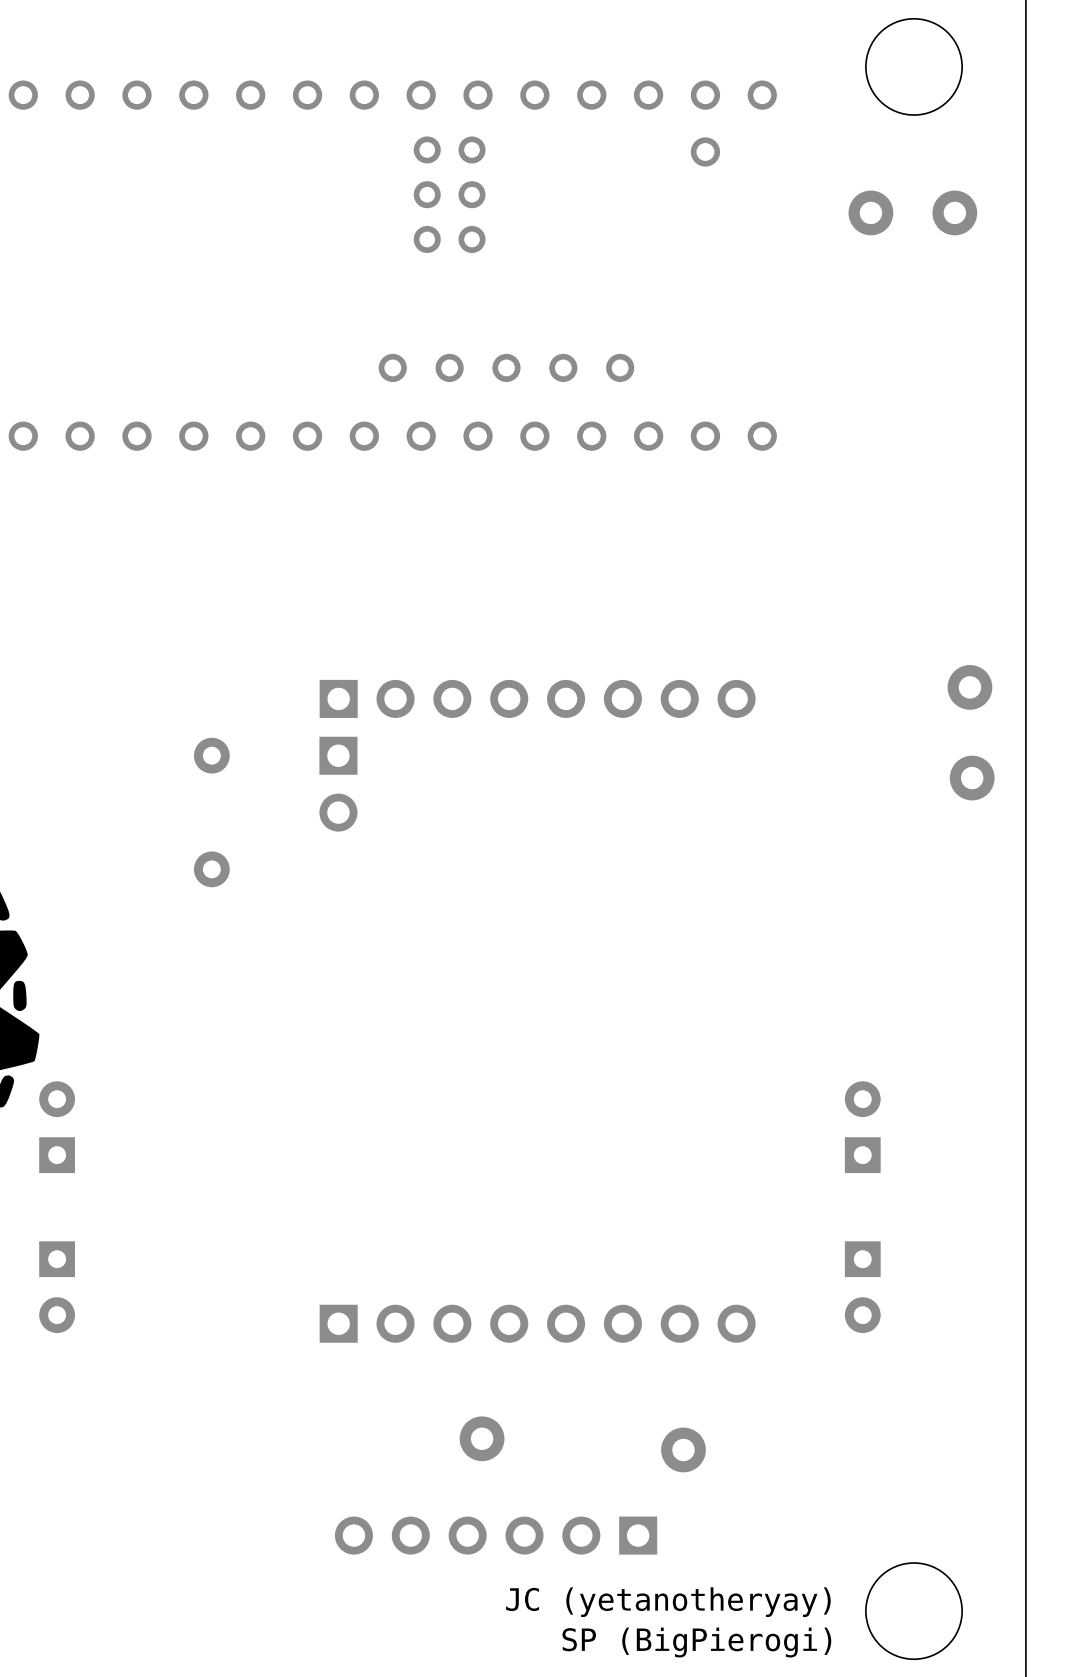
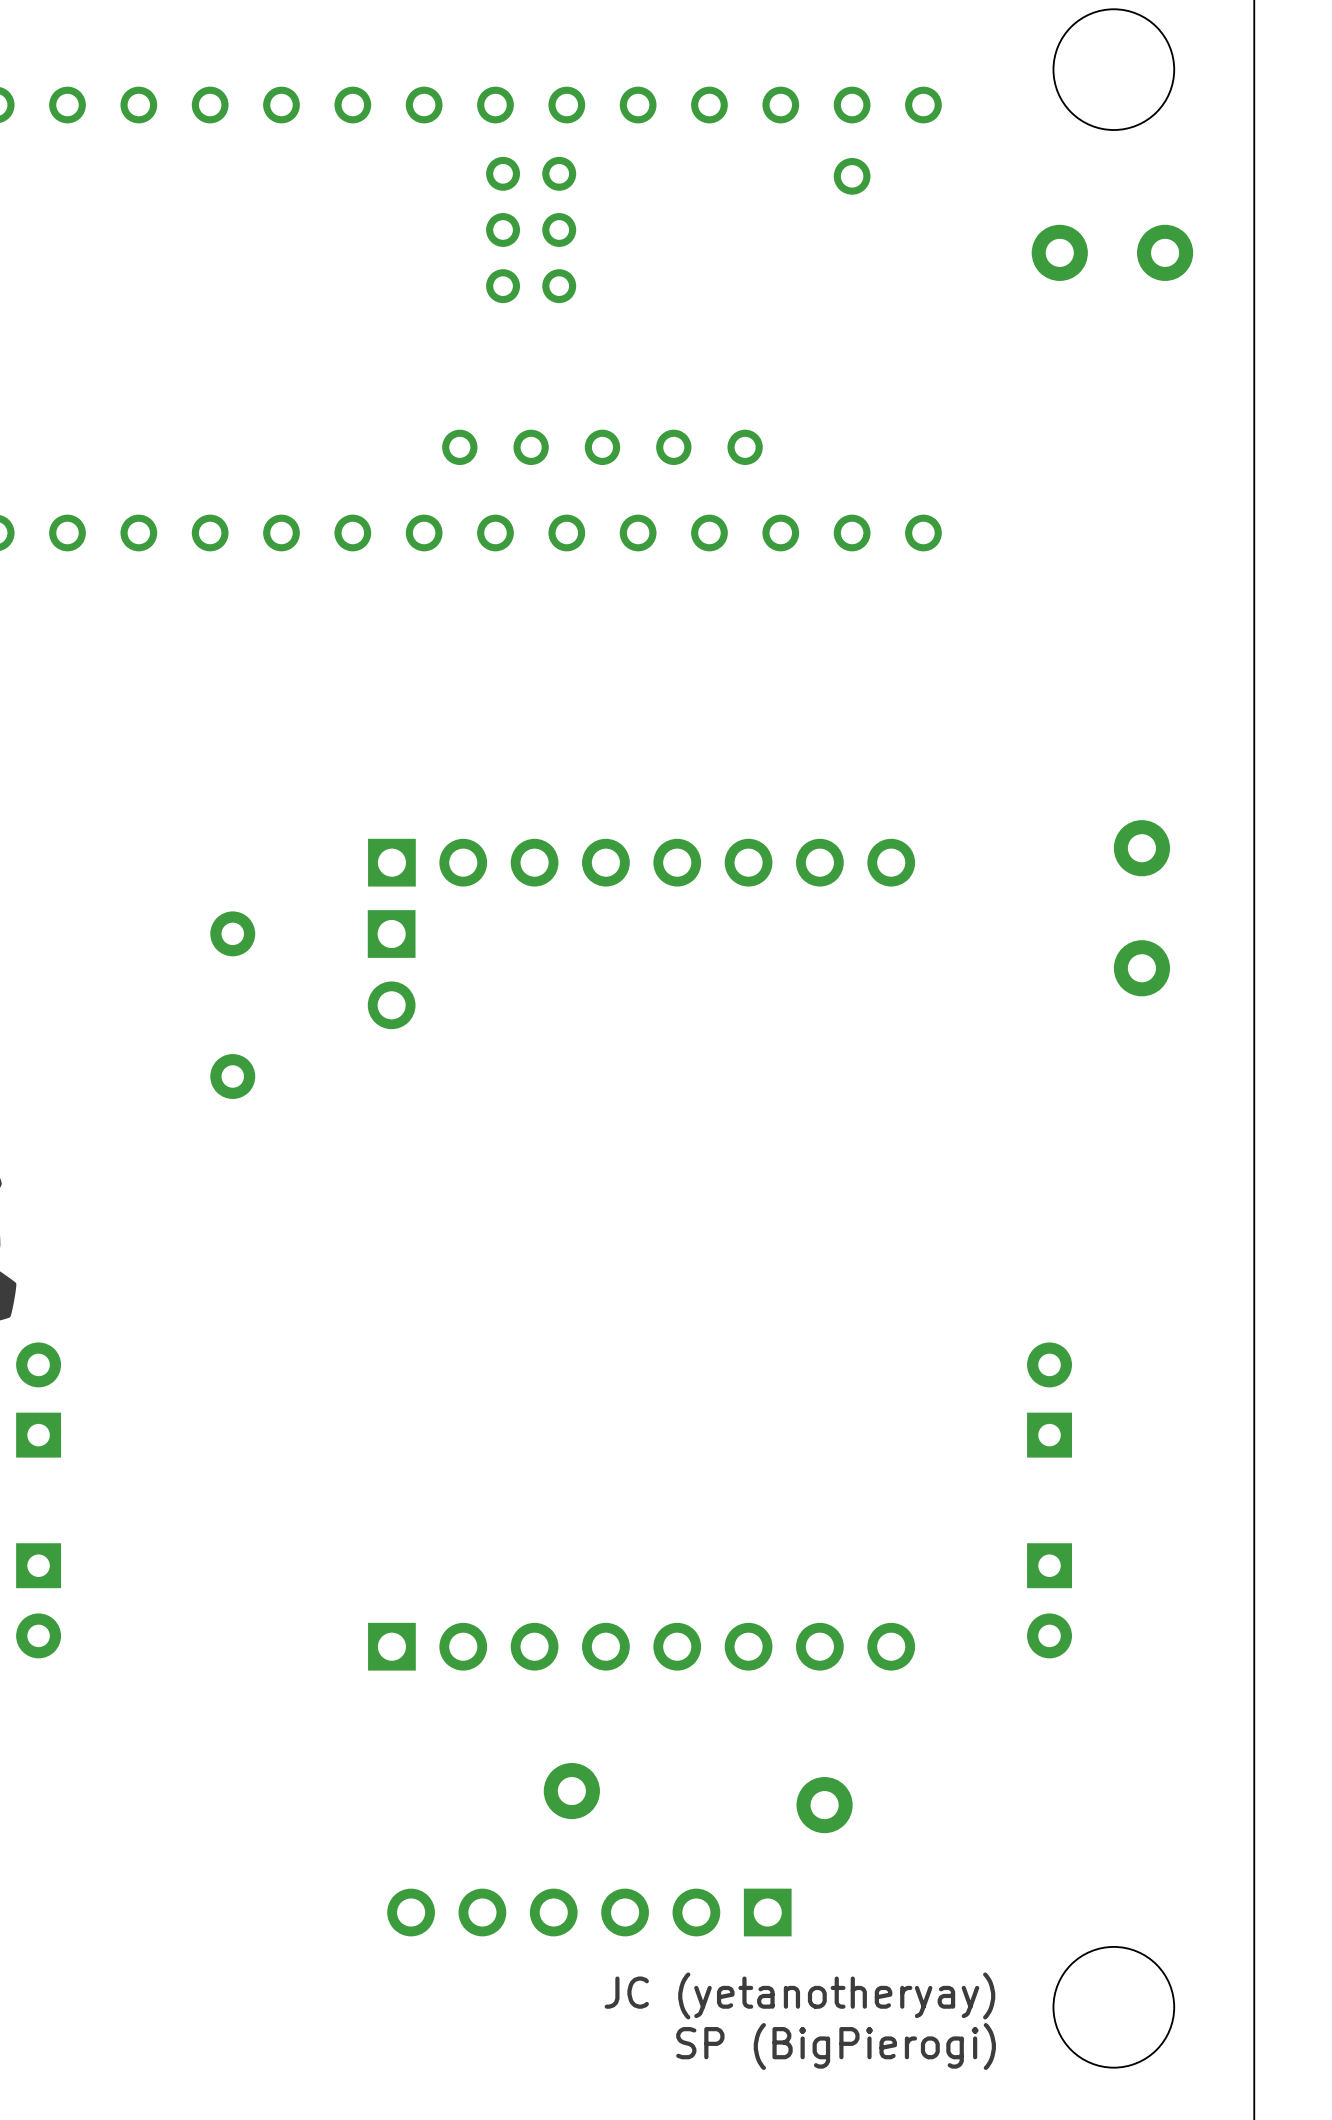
part position: (969, 687) -> (1141, 848)
part position: (972, 778) -> (1141, 968)

